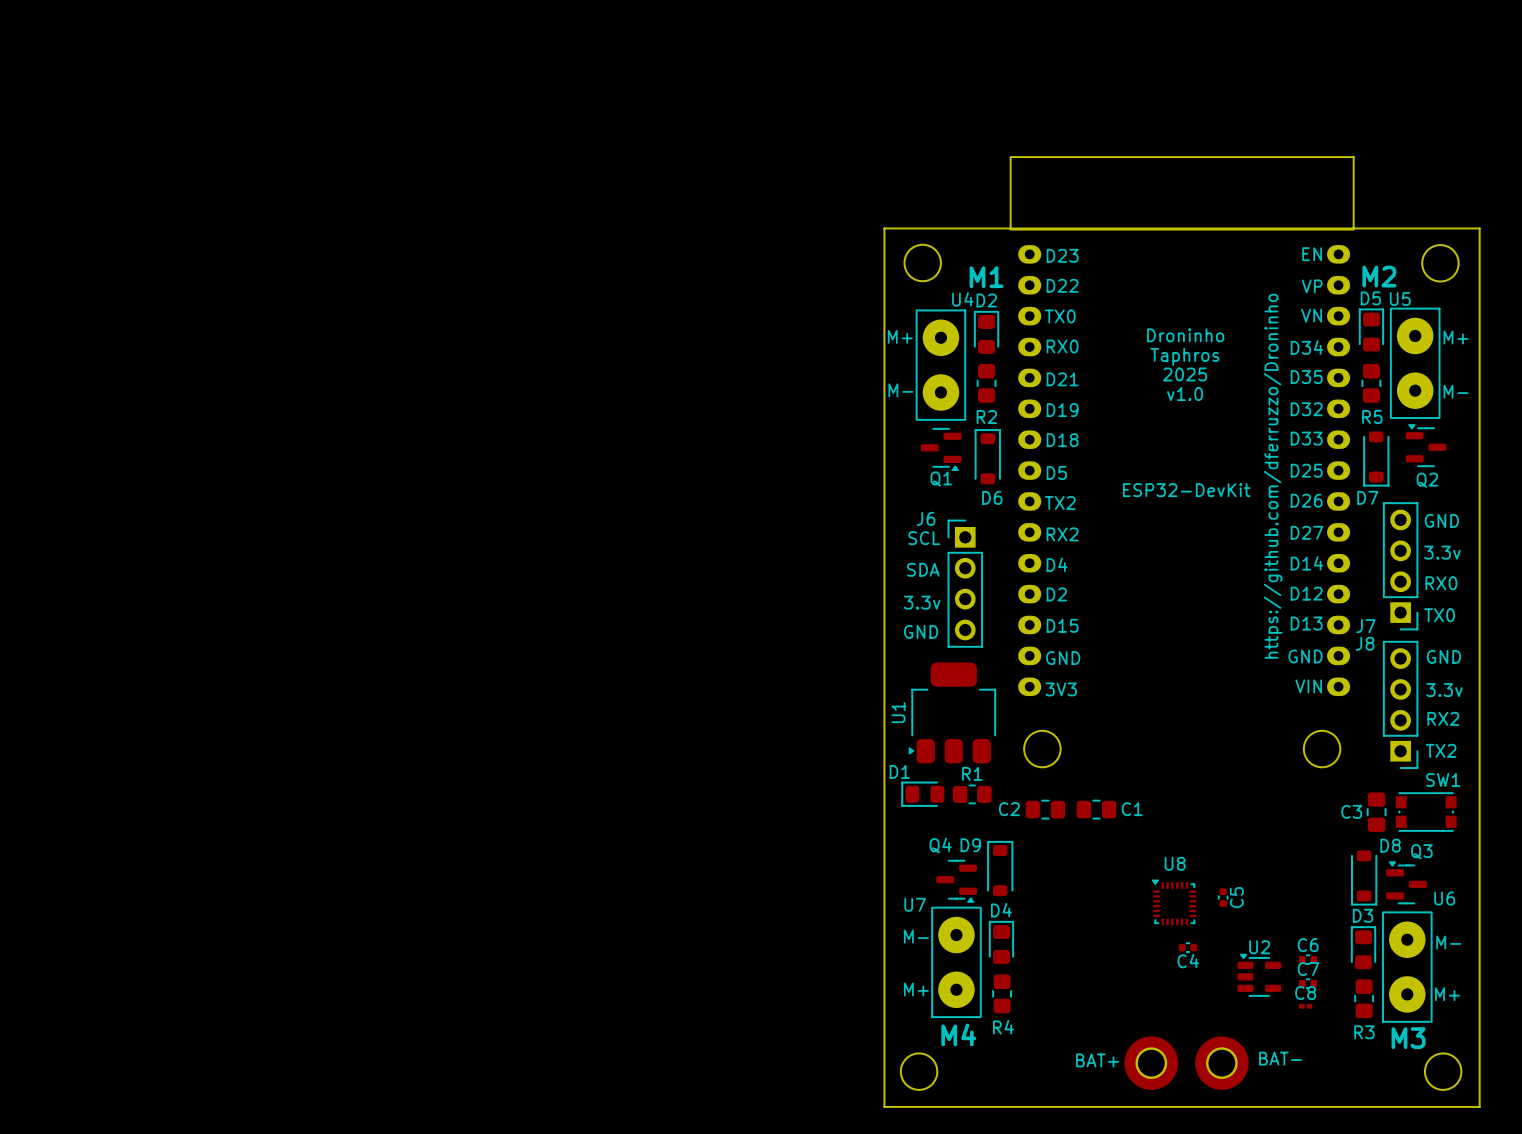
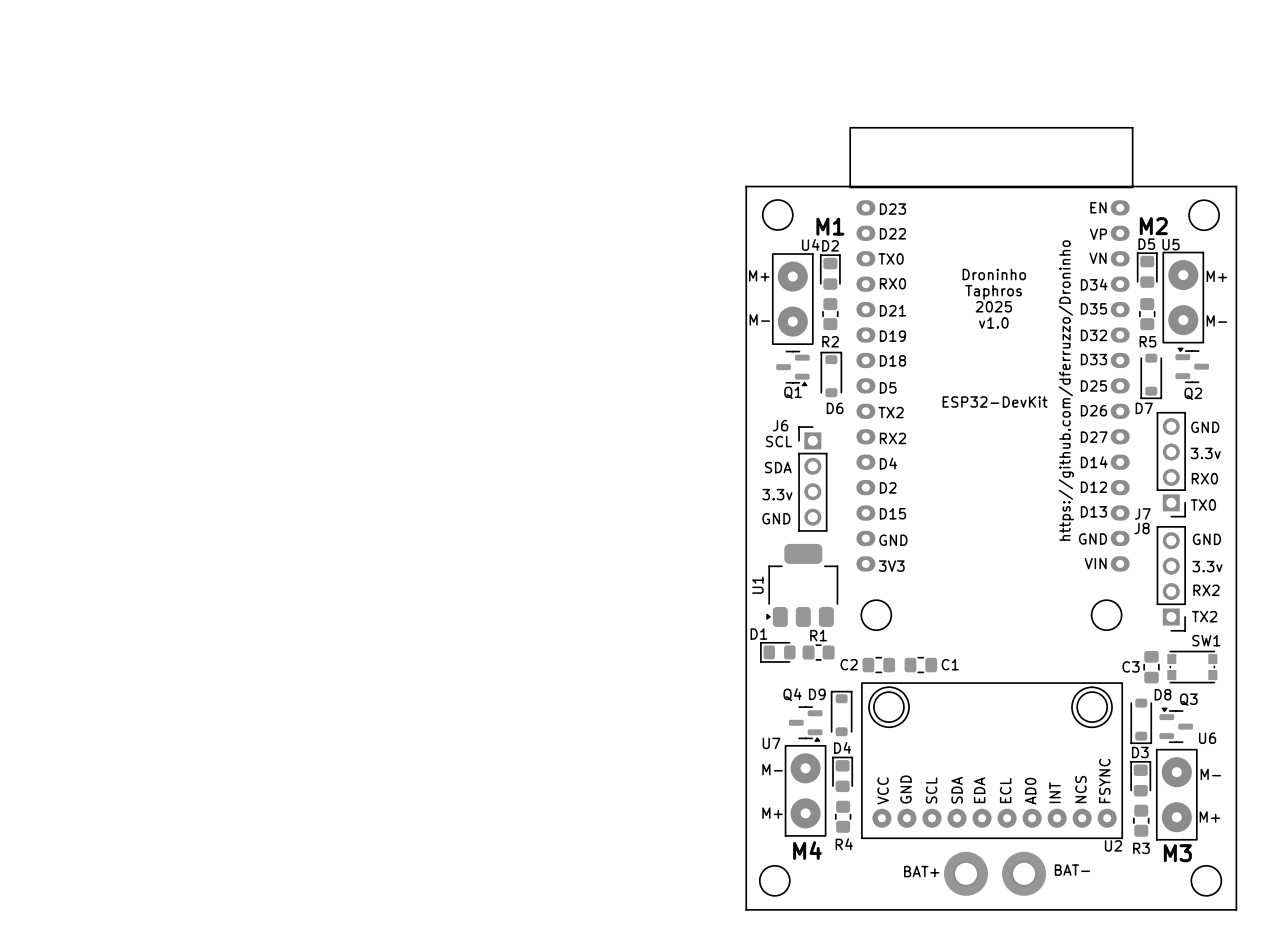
round board edge: none -> [868, 686, 910, 728]
round board edge: none -> [1071, 686, 1113, 728]
C5: (1223, 897) -> none
U8: (1174, 902) -> none
C4: (1187, 947) -> none
U2 name position: U2 (1259, 947) -> U2 (1113, 845)
U2 footprint: [1237, 953, 1282, 997] -> [861, 682, 1123, 839]
C6: (1308, 959) -> none
C7: (1308, 983) -> none
C8: (1305, 1006) -> none

